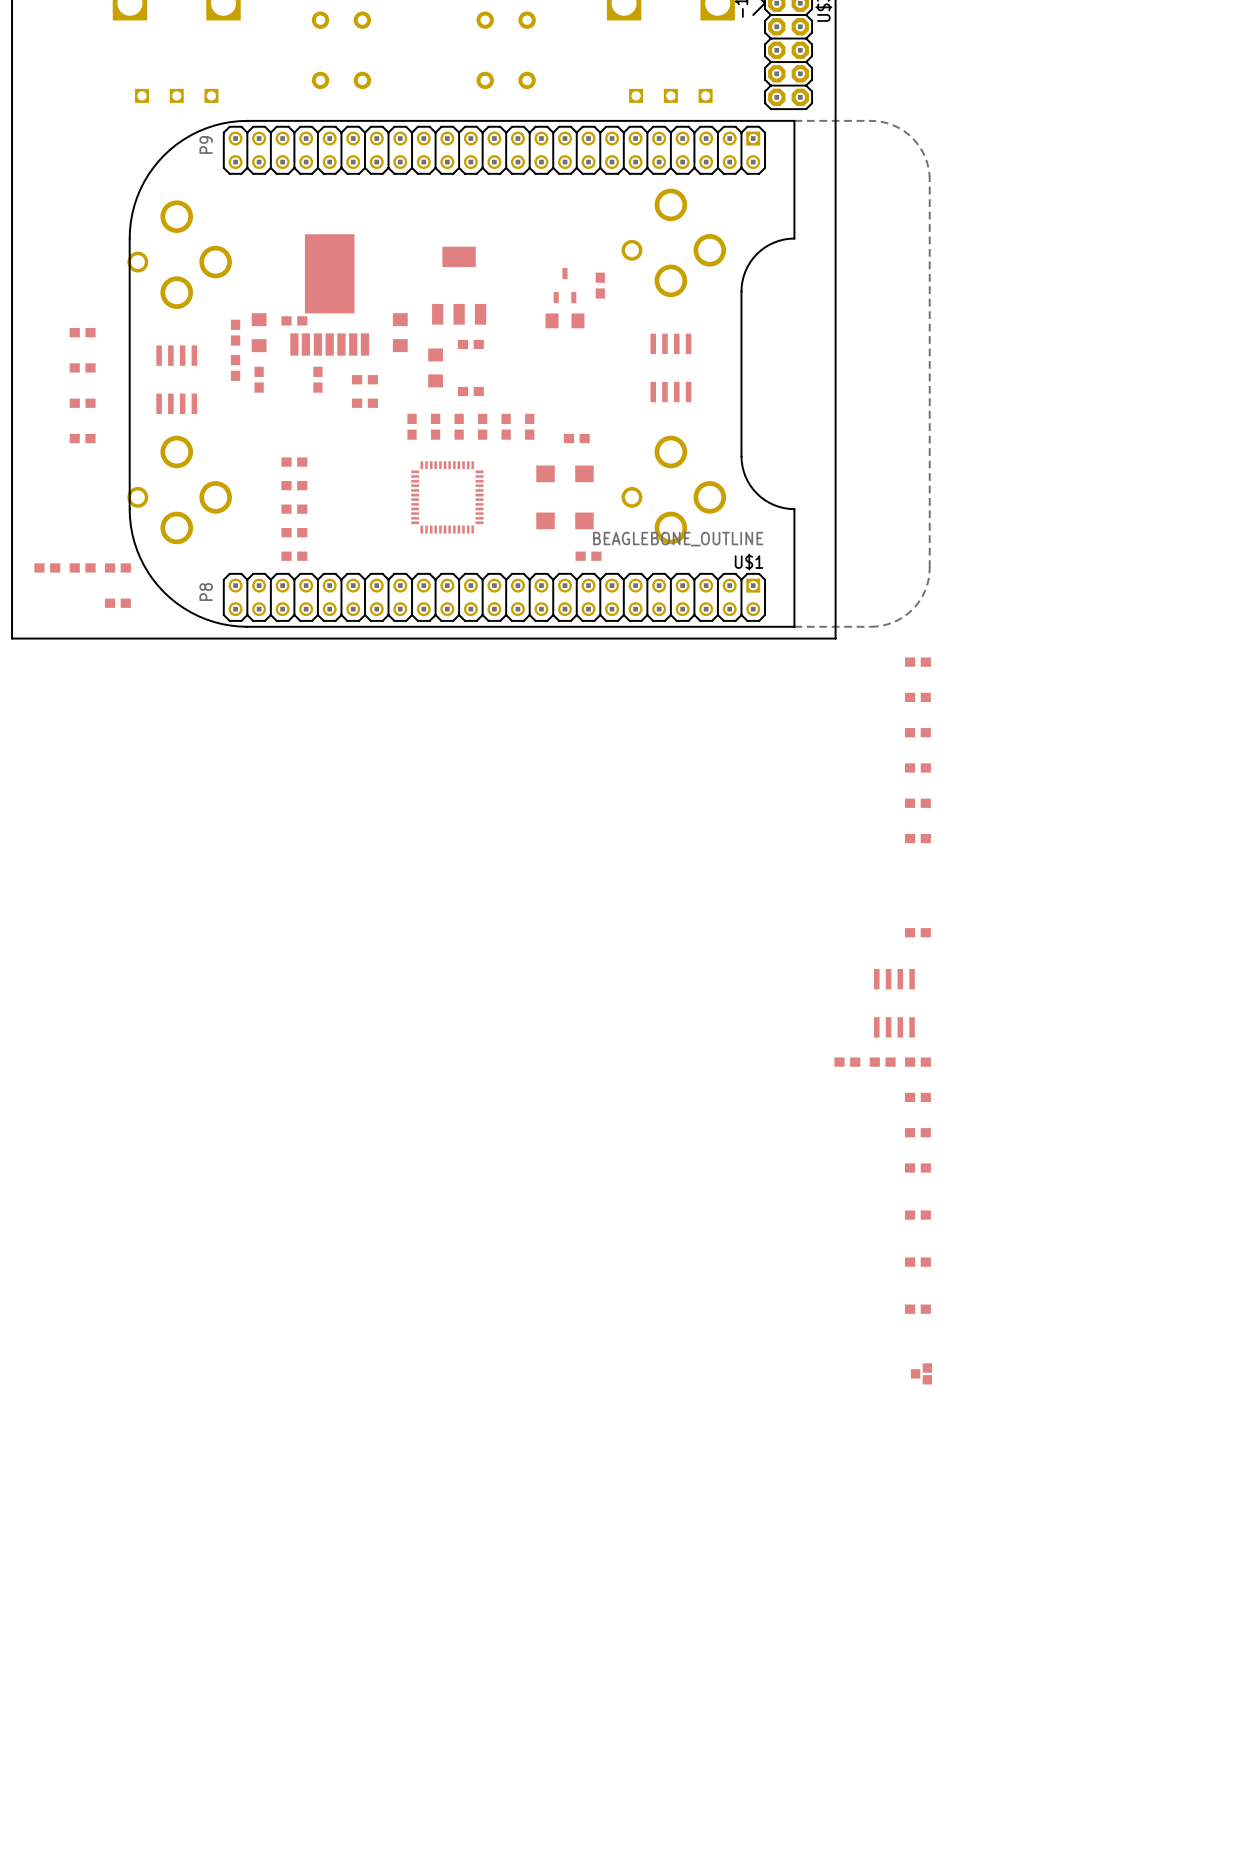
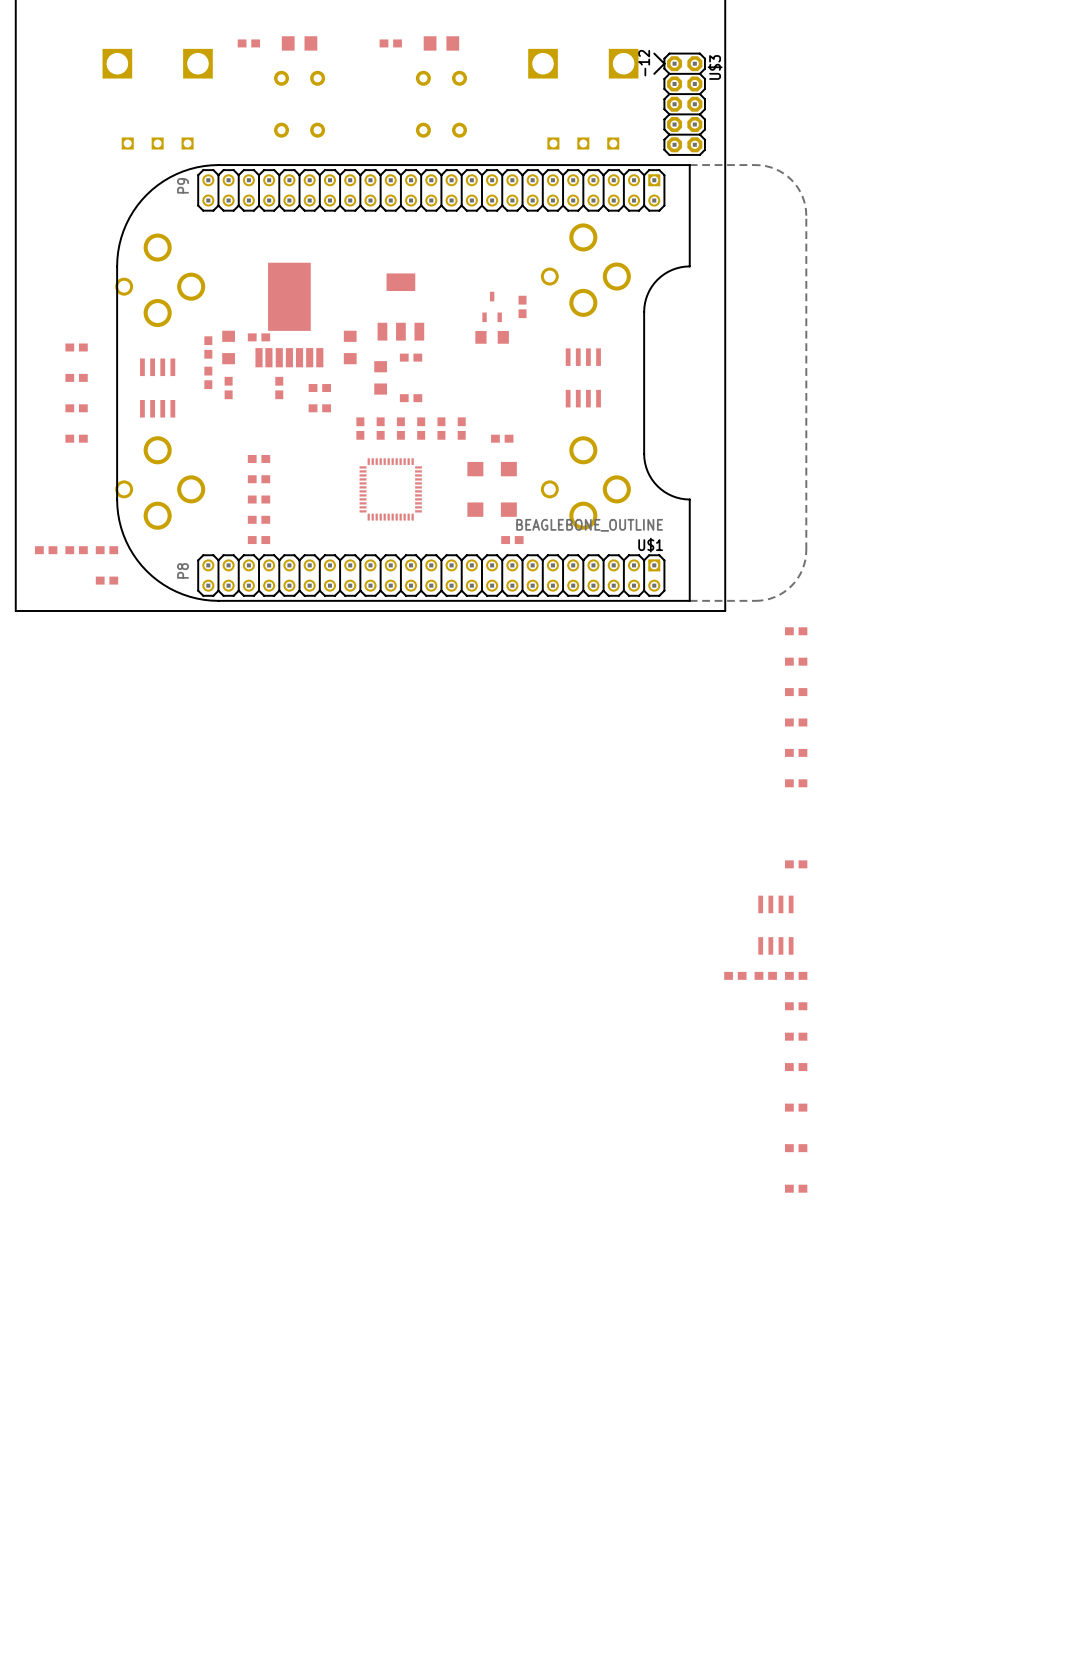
part: (921, 1373) -> none

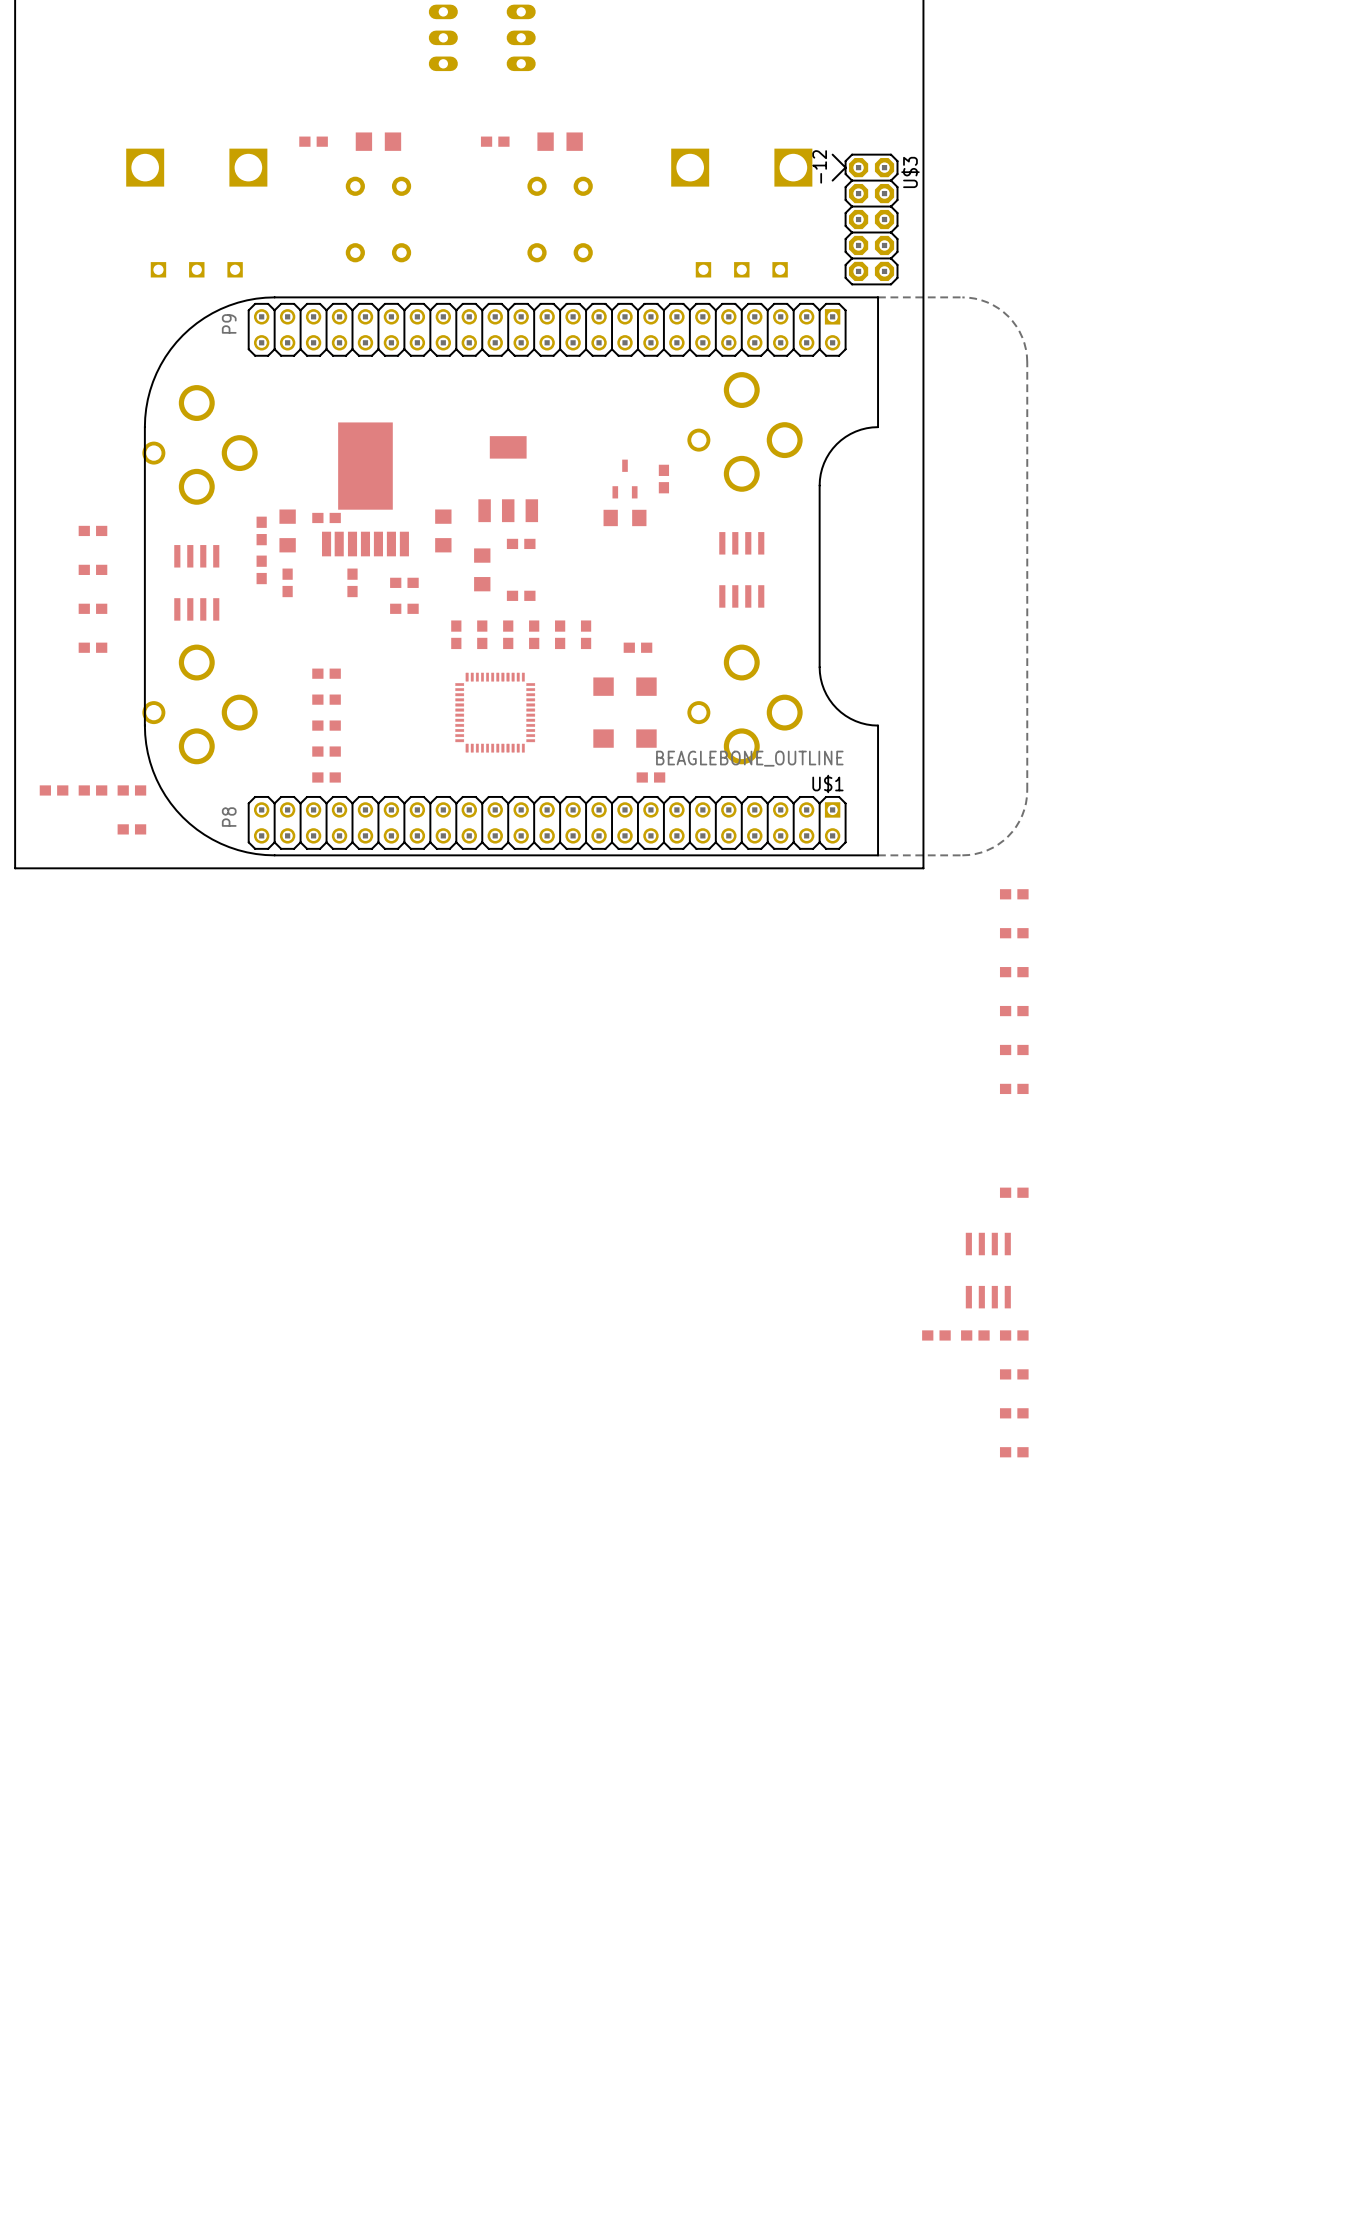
part: (796, 1107) -> none
part: (796, 1148) -> none
part: (796, 1188) -> none

